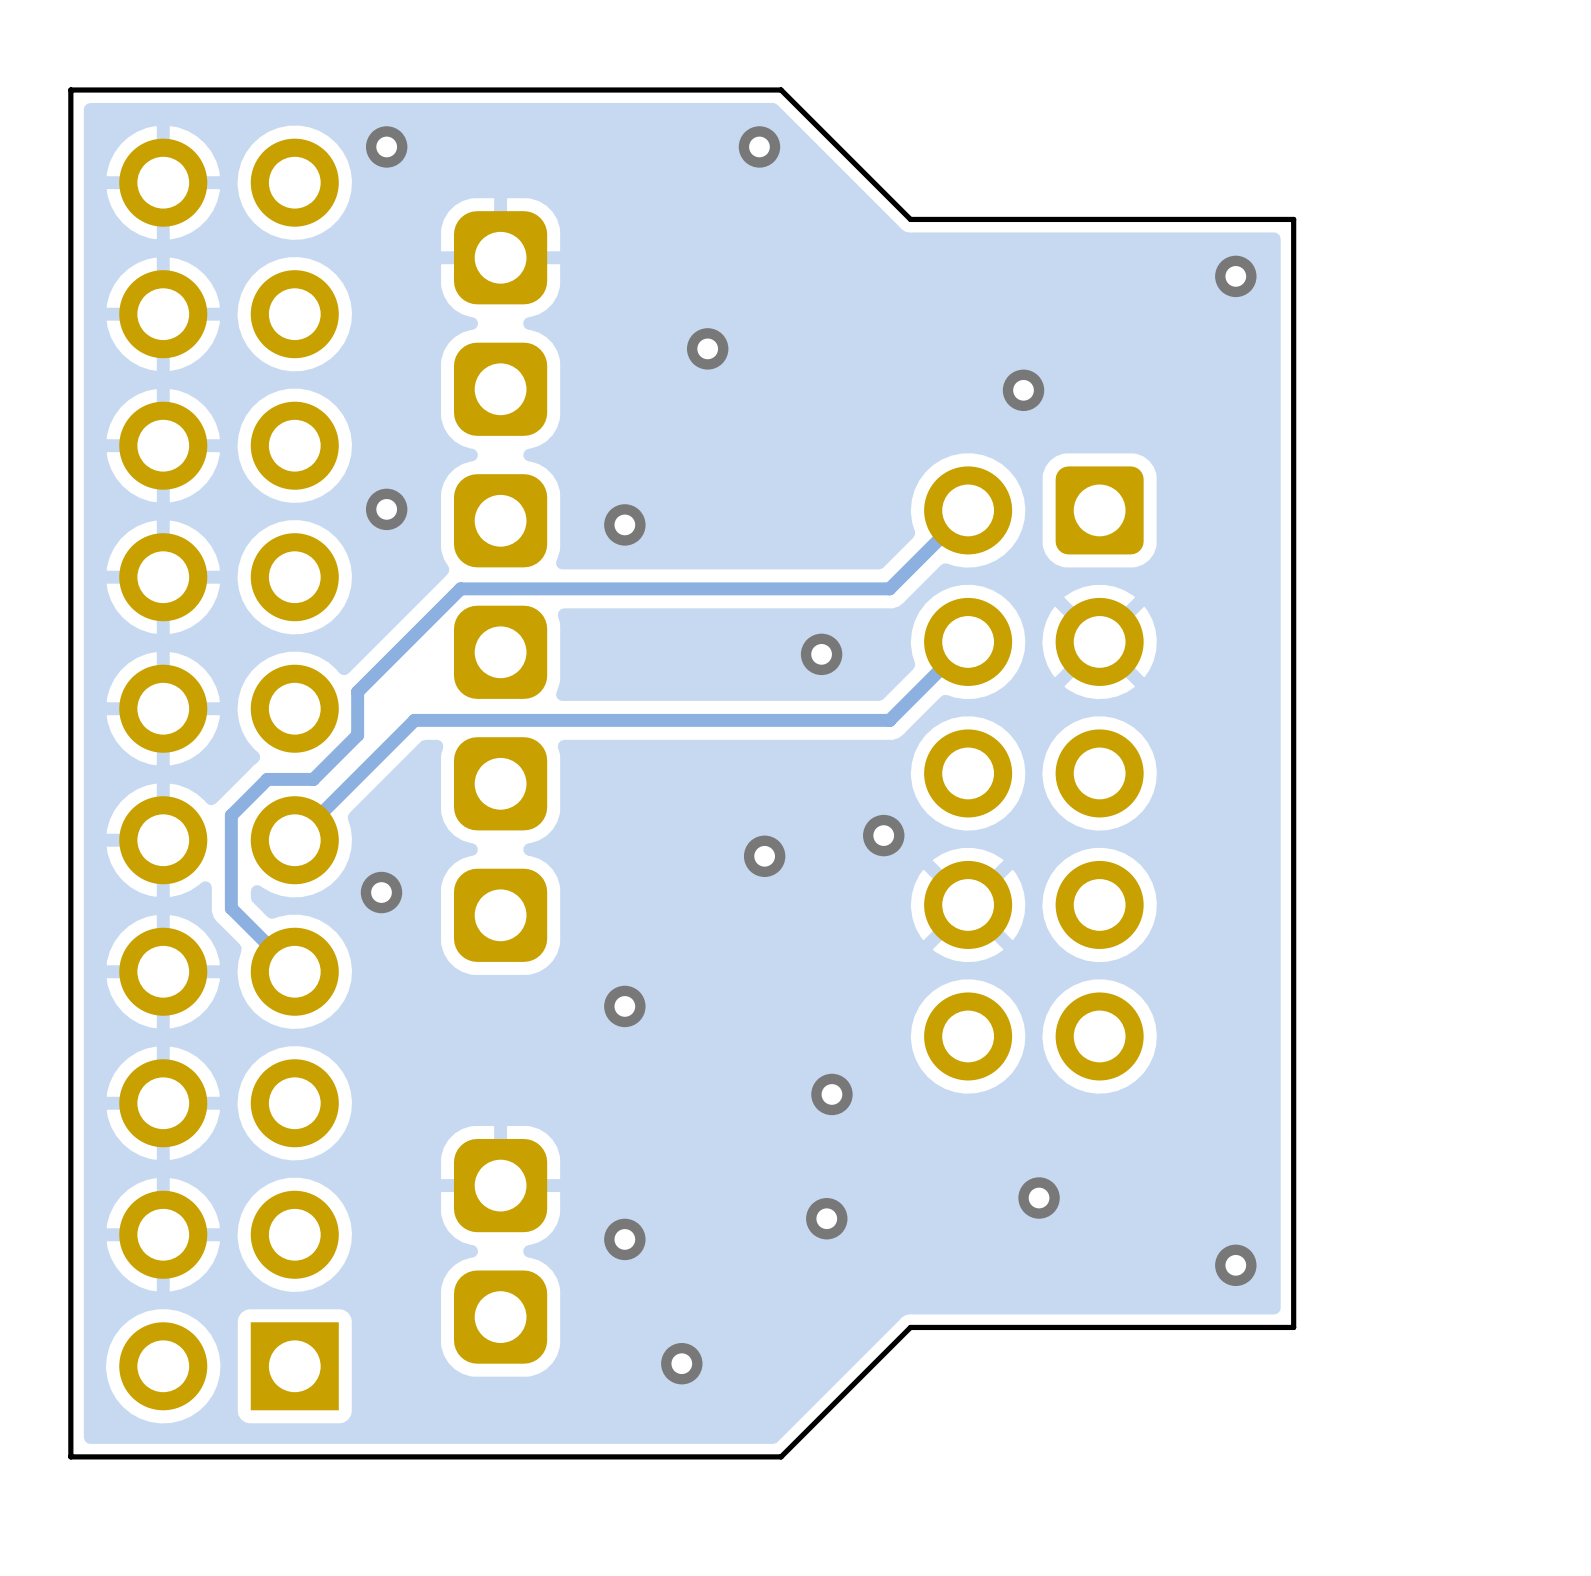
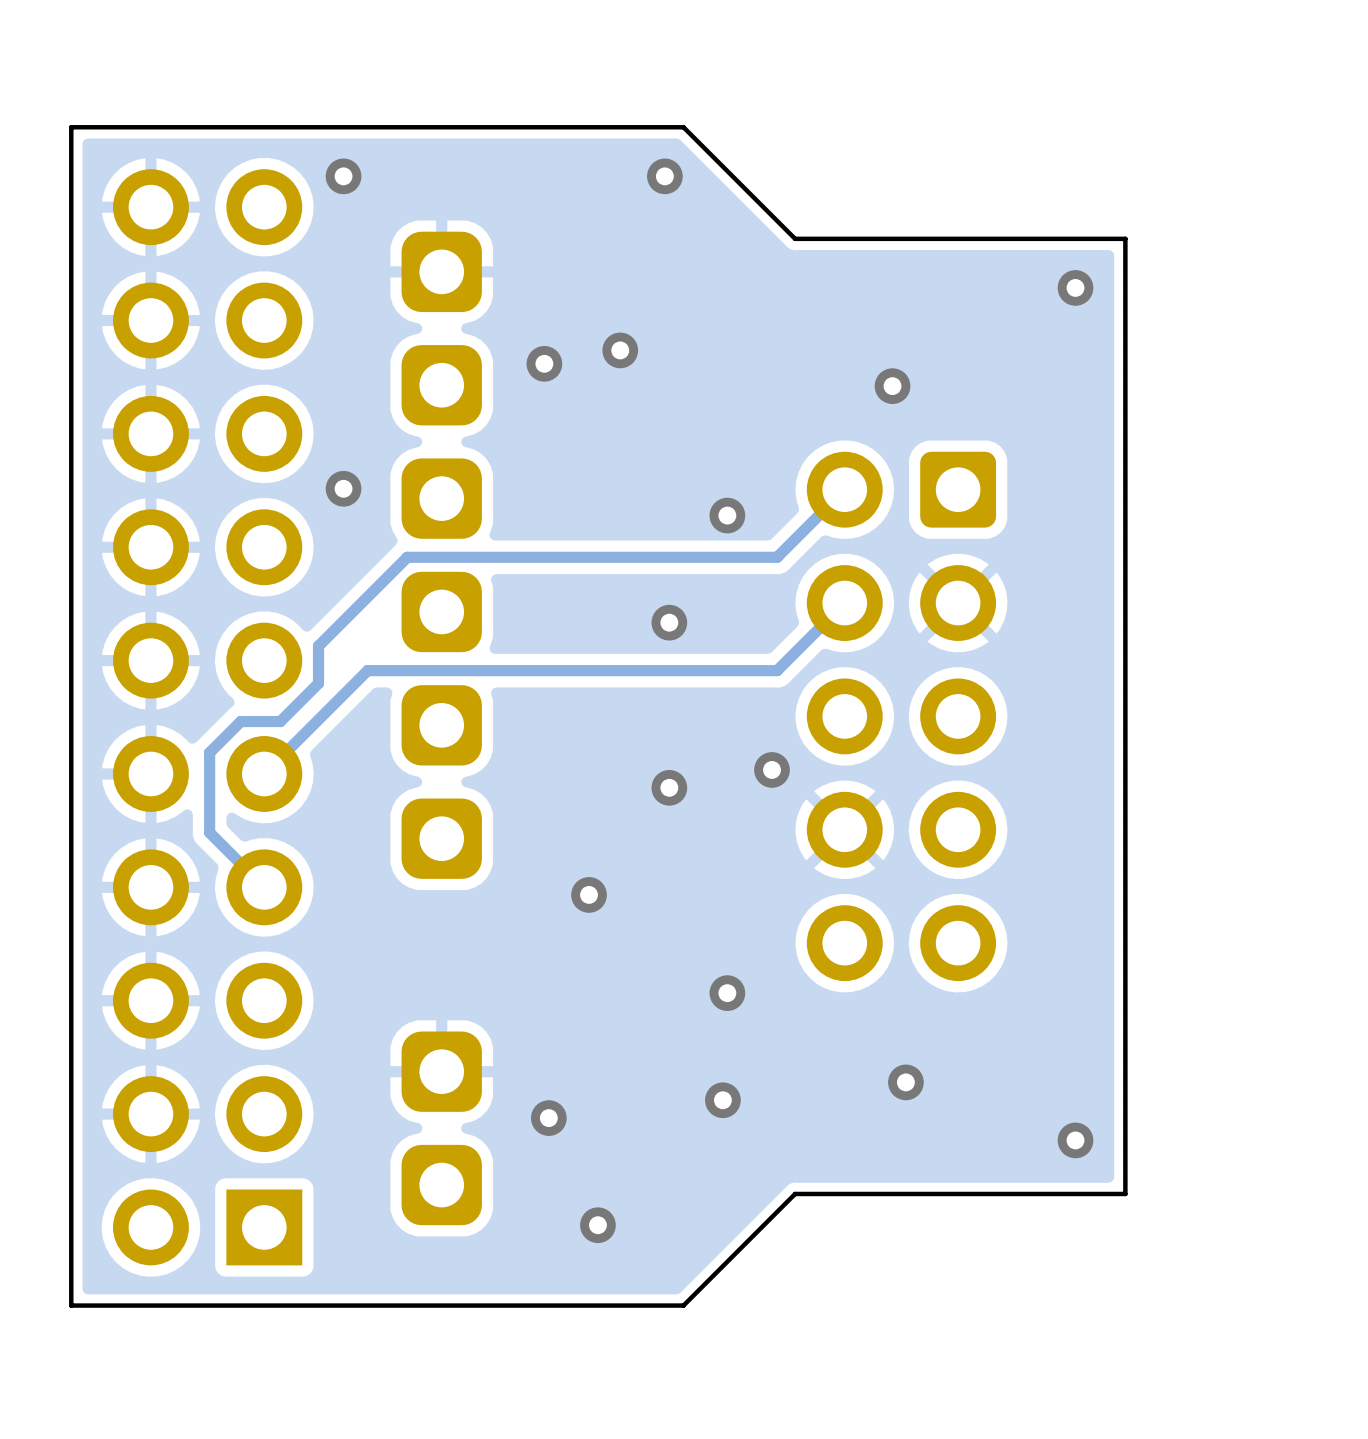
via: none -> (544, 363)
via: (624, 524) -> none
via: none -> (727, 515)
via: (821, 654) -> none
via: none -> (669, 622)
via: (381, 892) -> none
via position: (624, 1006) -> (589, 894)

